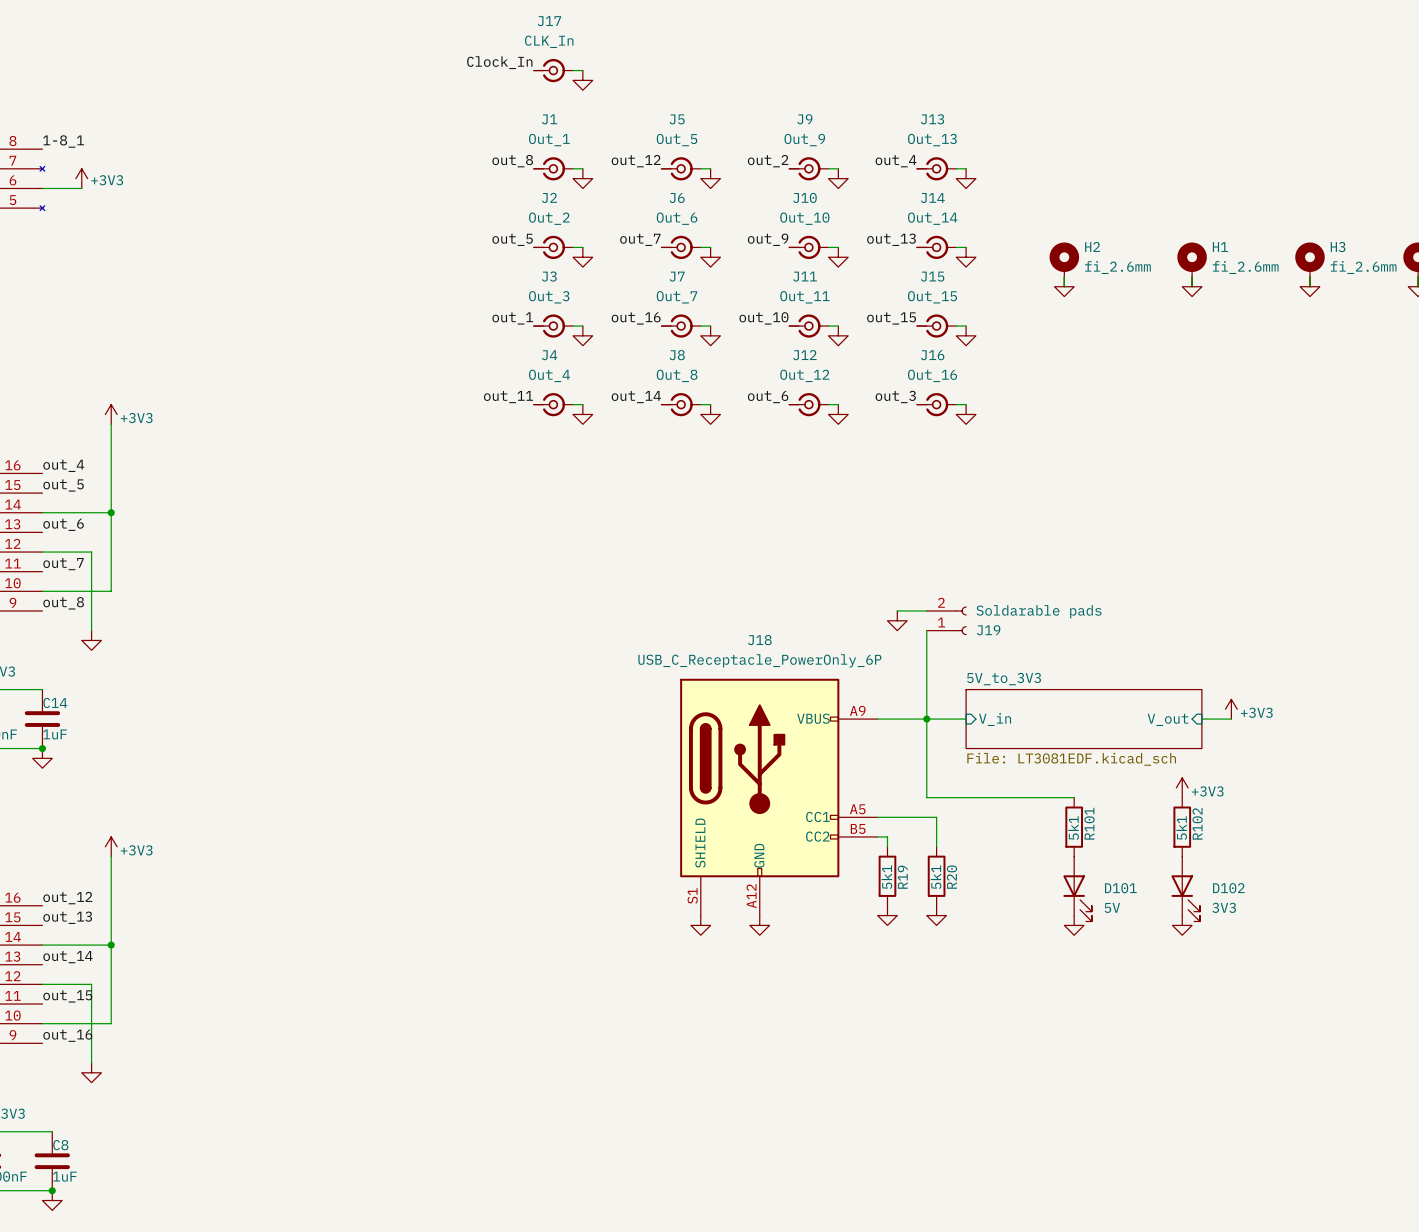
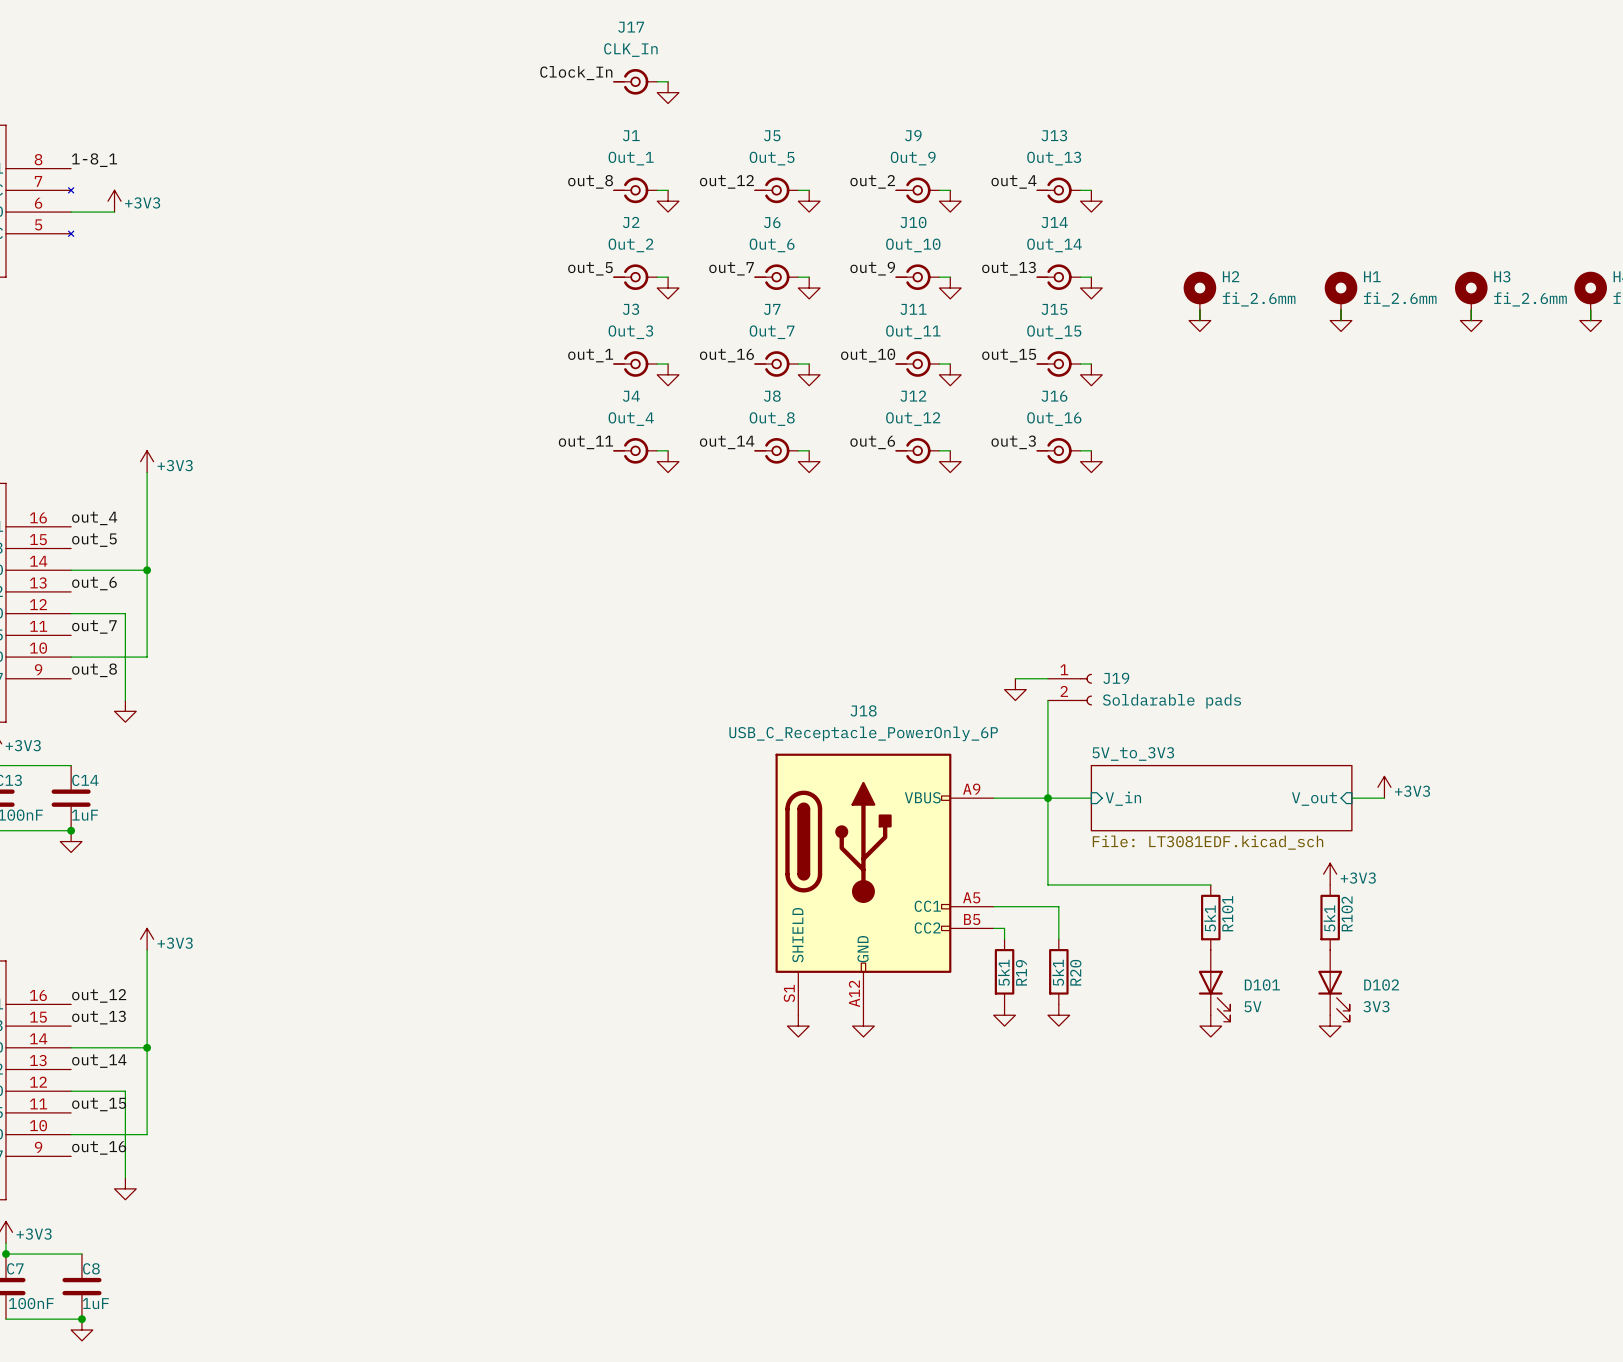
J19 flip: as is (961, 620) -> up-down (1085, 689)

